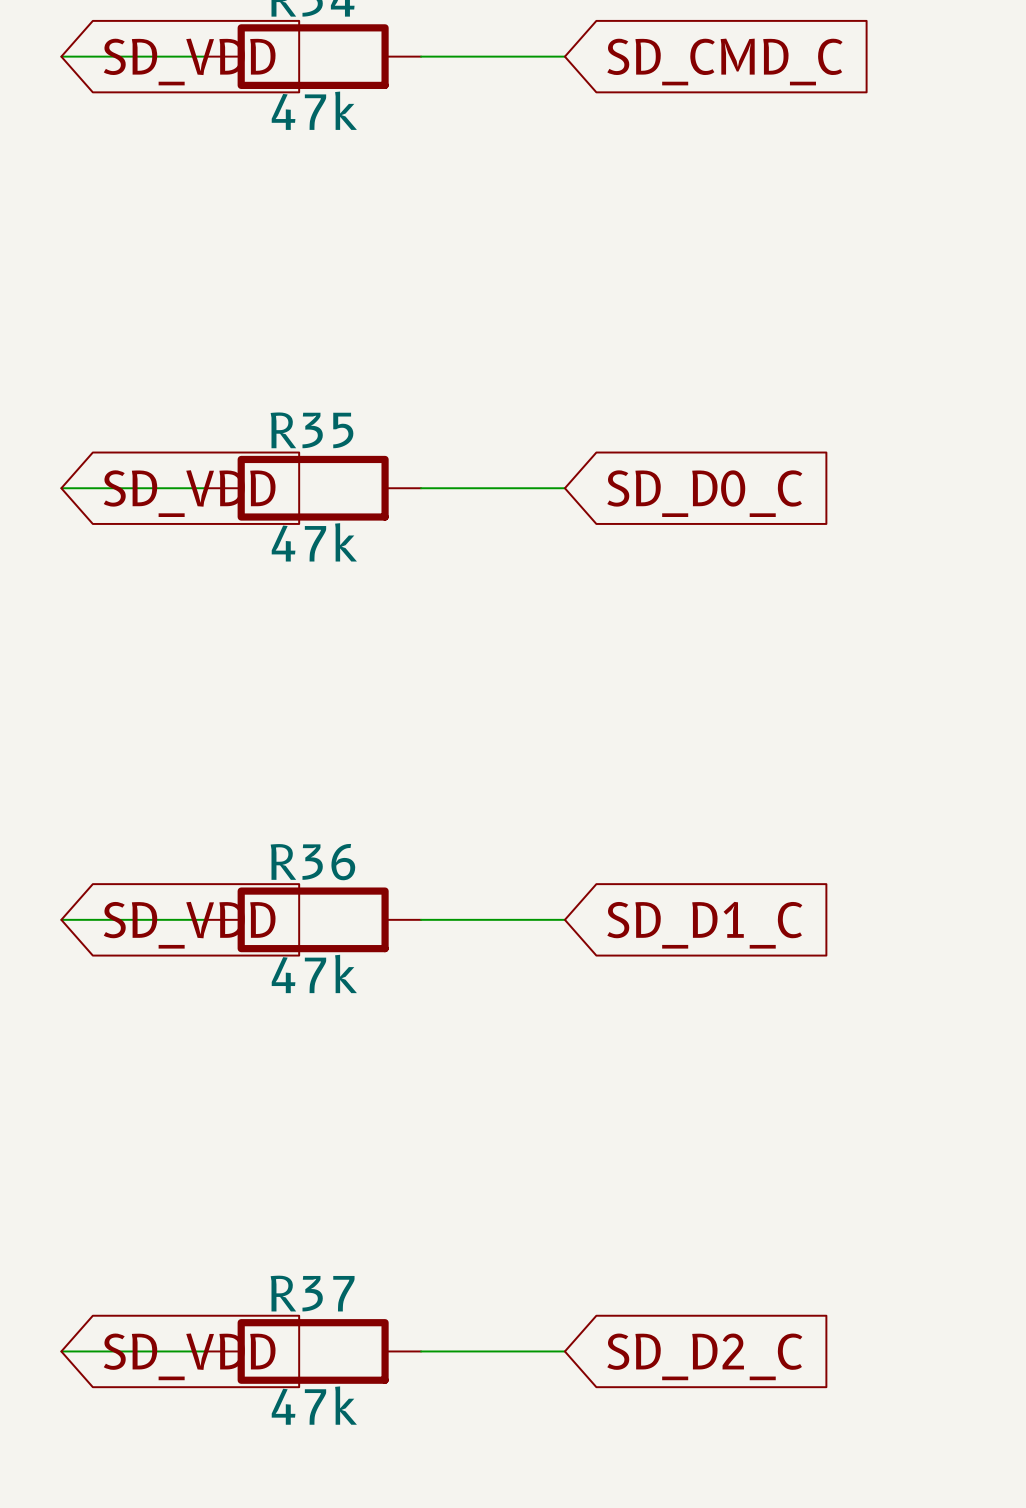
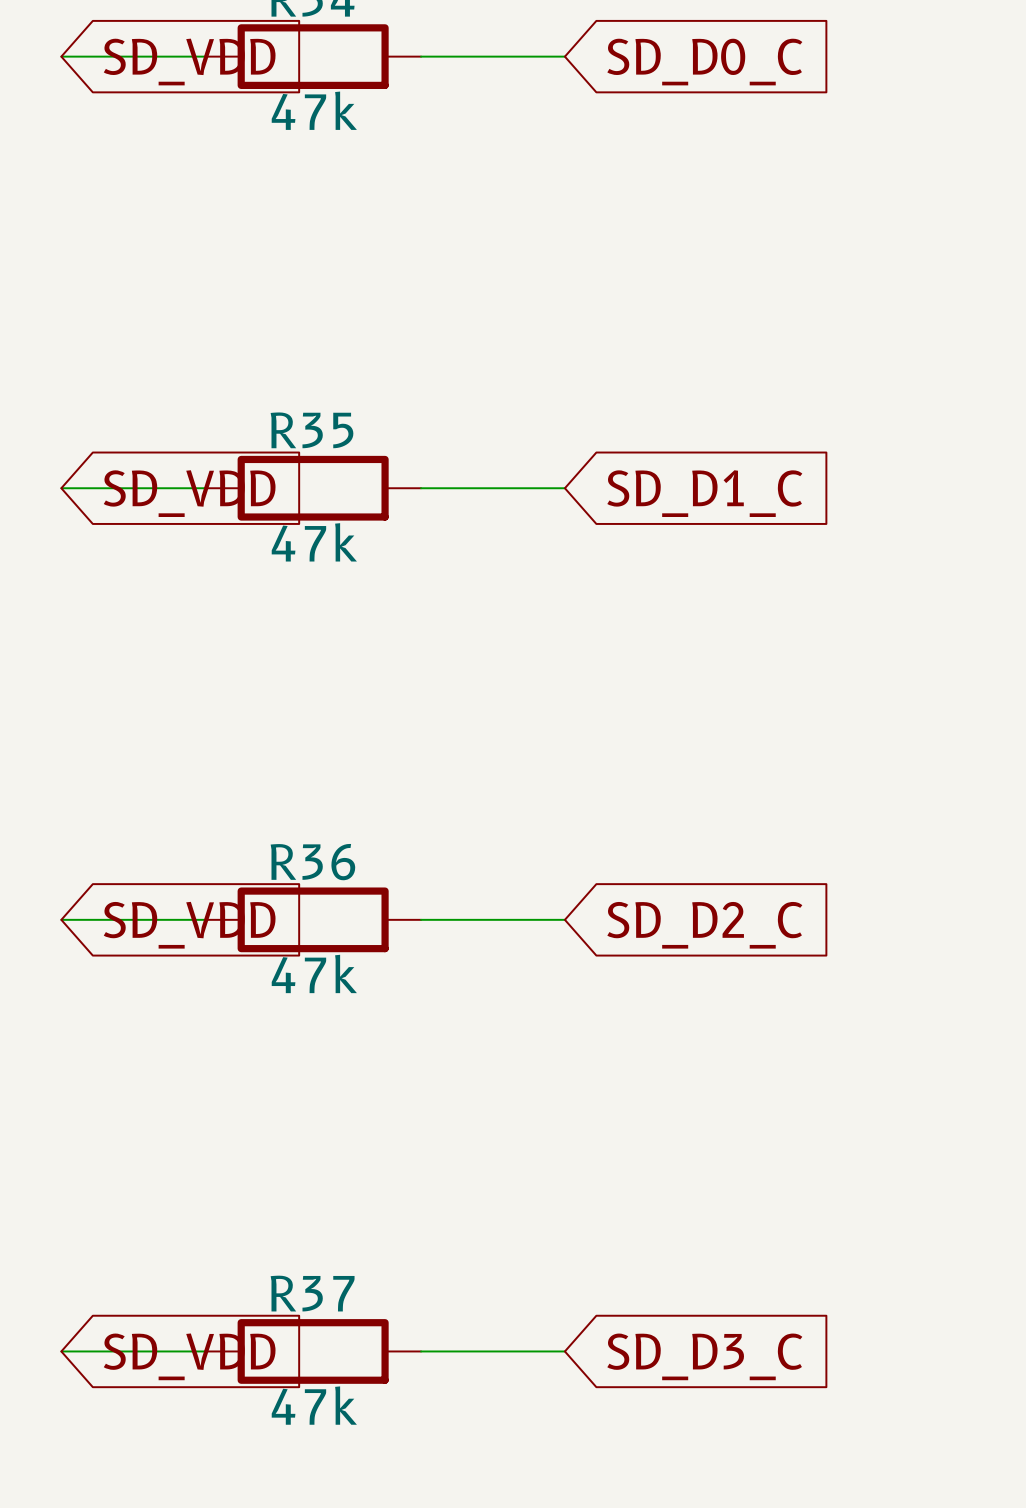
global label: SD_CMD_C (724, 62) -> SD_D0_C (704, 62)
global label: SD_D0_C (704, 493) -> SD_D1_C (704, 493)
global label: SD_D1_C (704, 925) -> SD_D2_C (704, 925)
global label: SD_D2_C (704, 1356) -> SD_D3_C (704, 1356)

